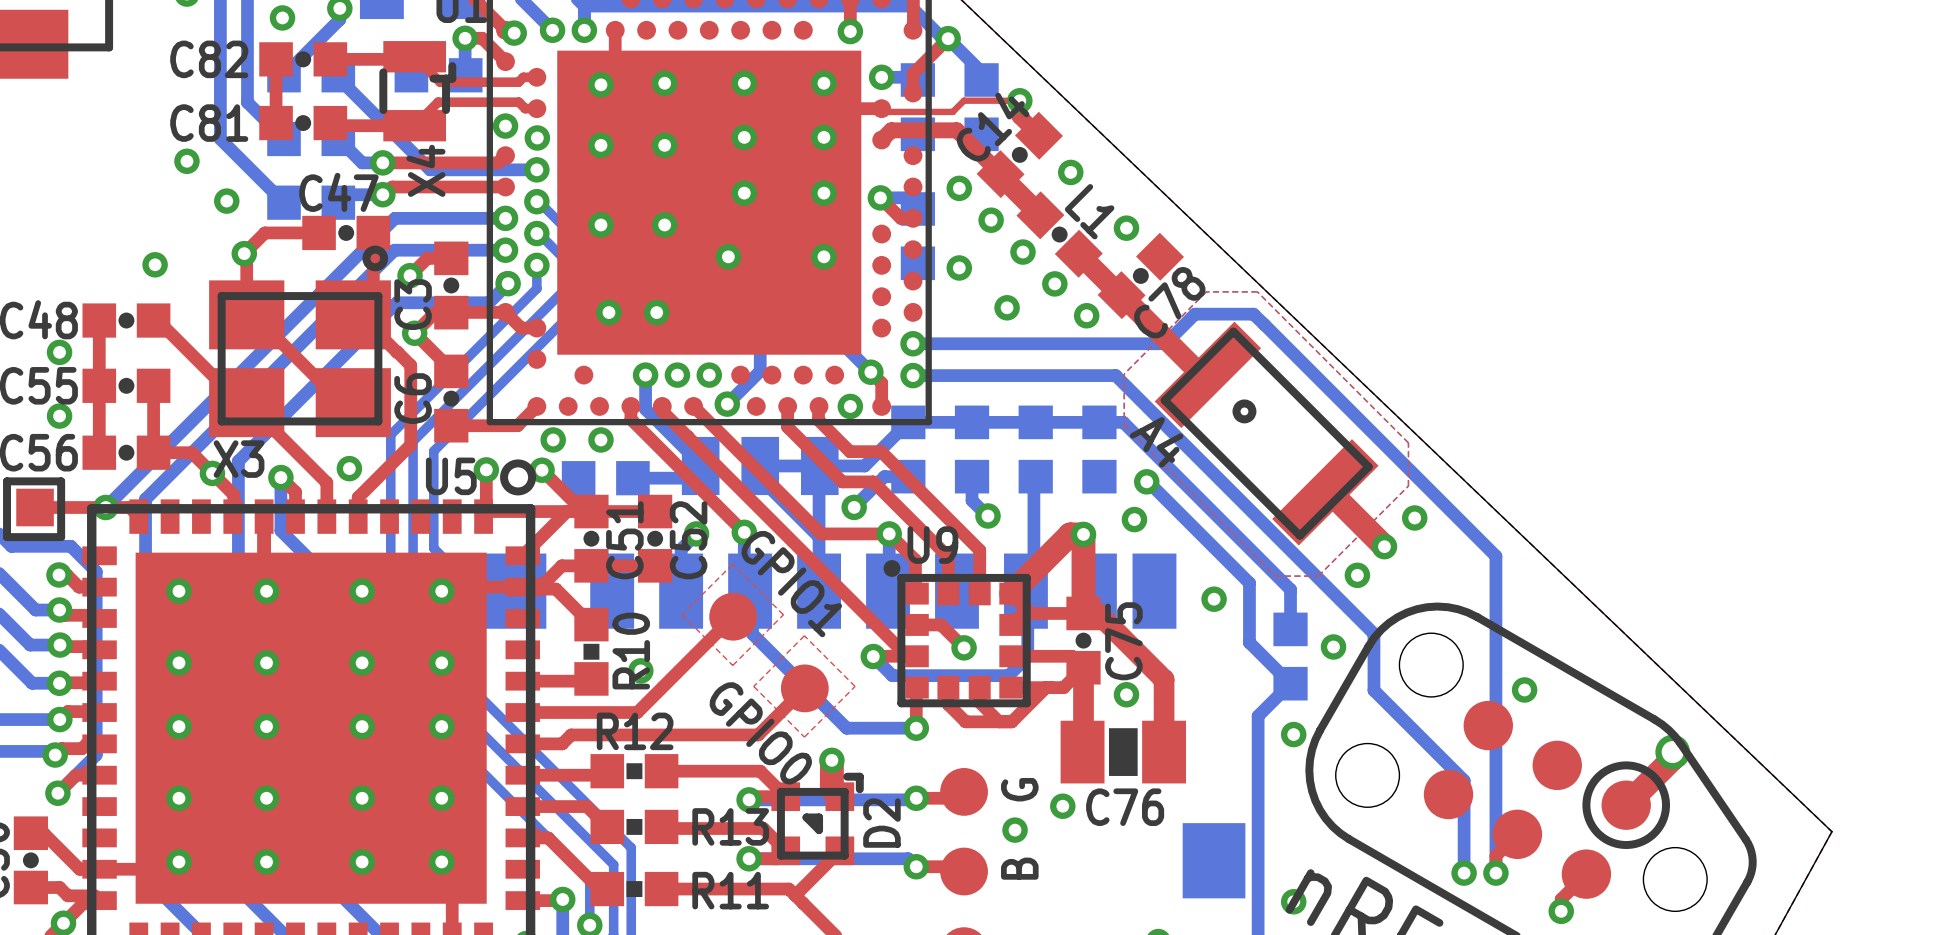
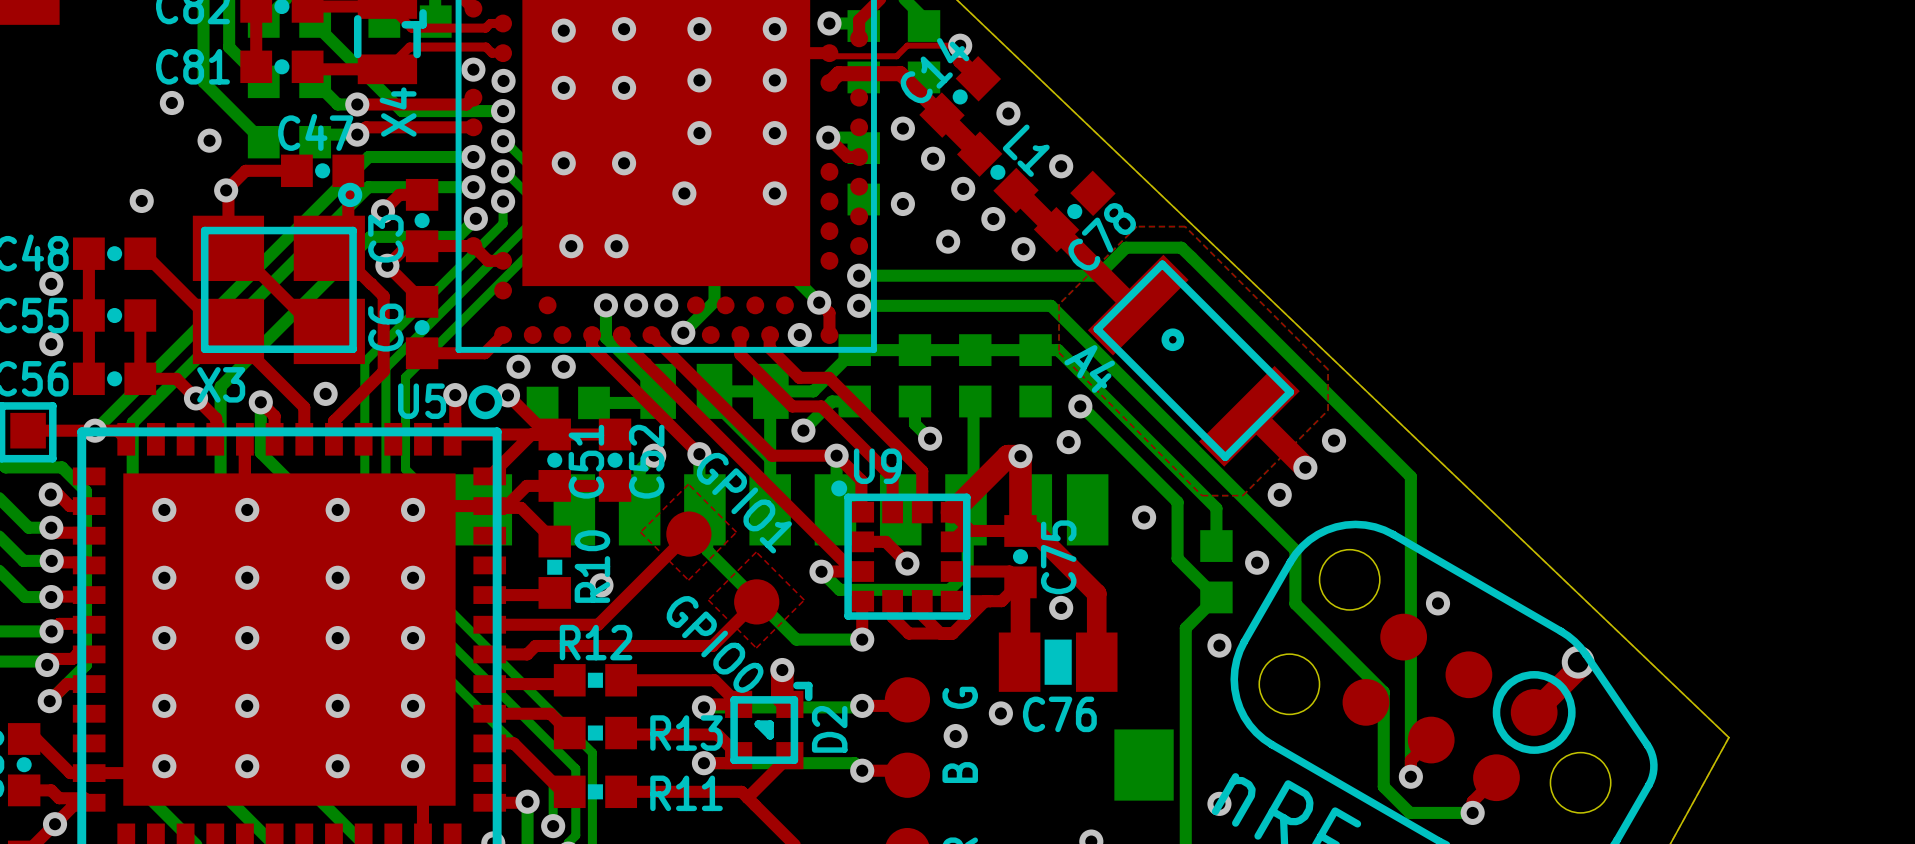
bottom track: (1464, 780) (1464, 873) -> (1380, 689) (1383, 692) (1383, 786) (1409, 812) (1472, 812)
via: (1464, 873) -> none

